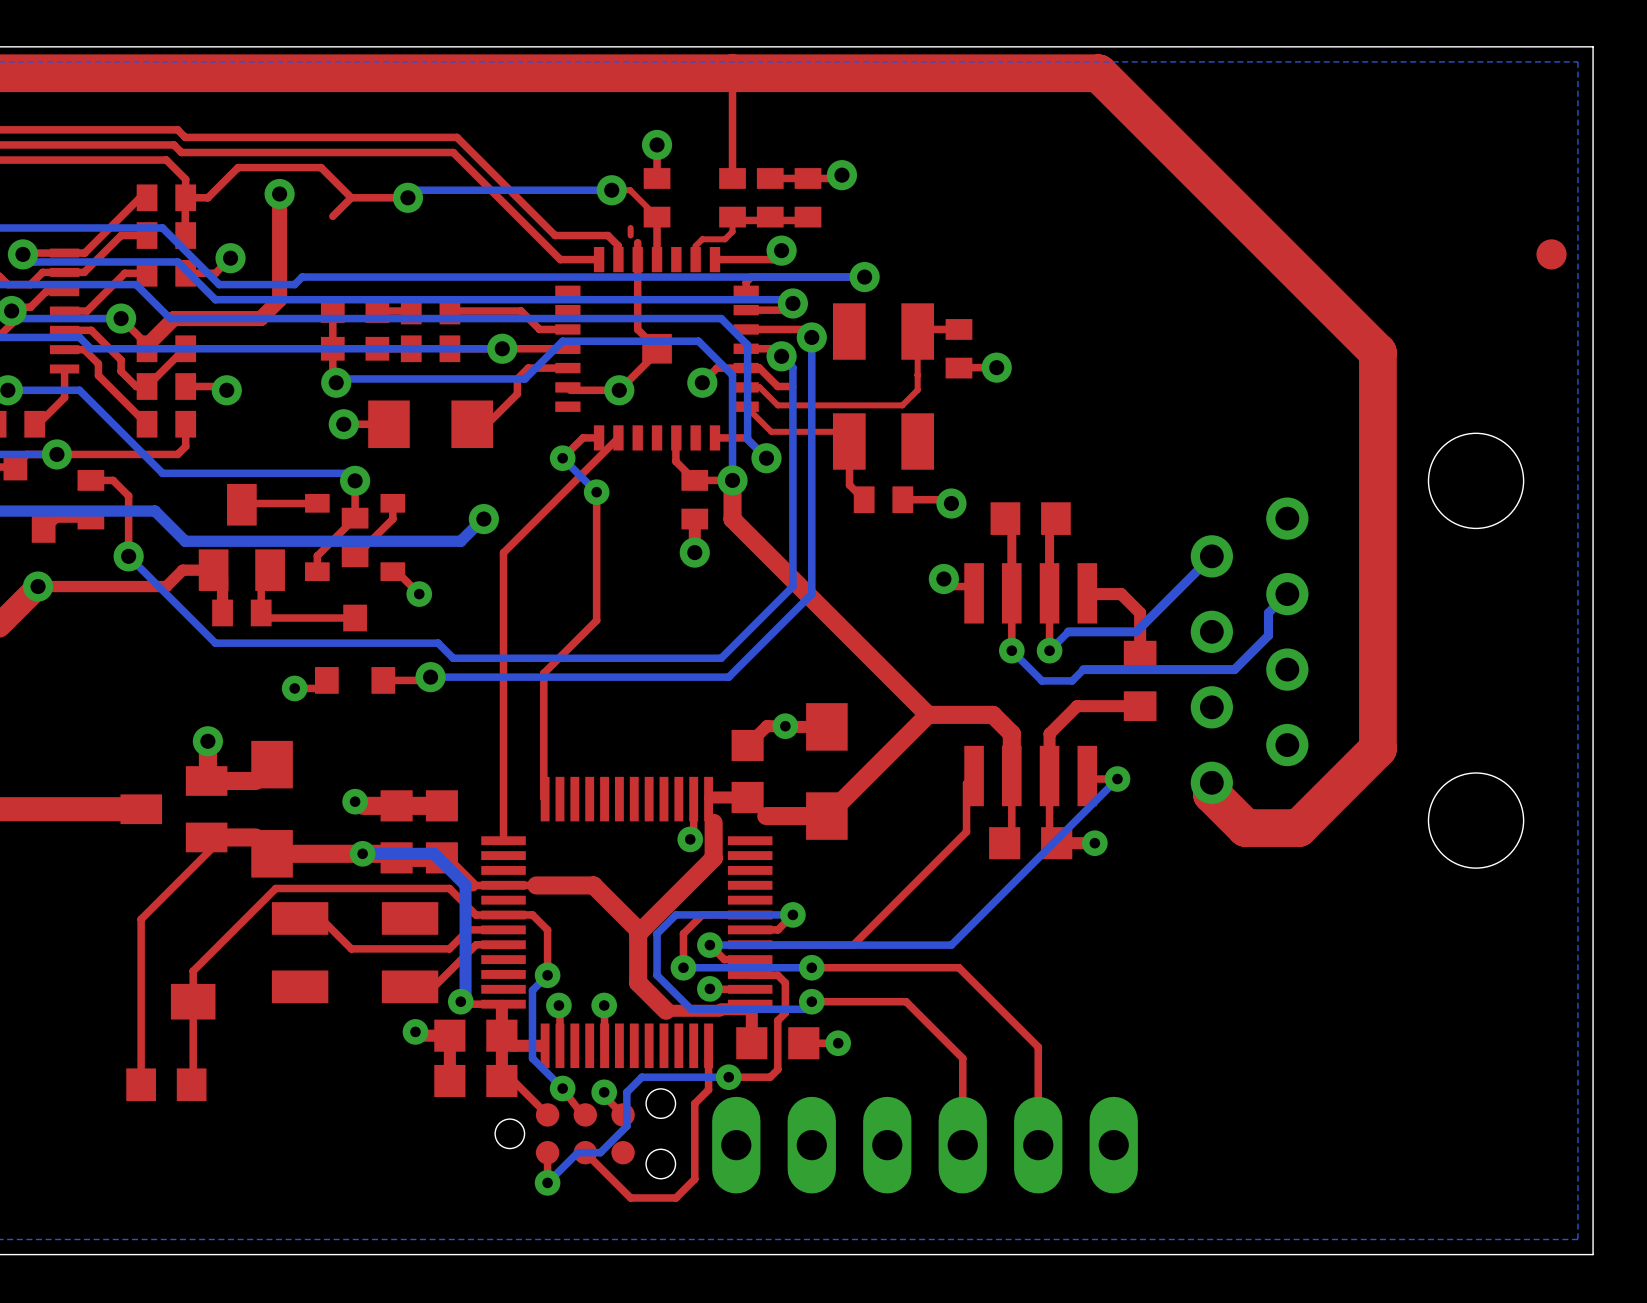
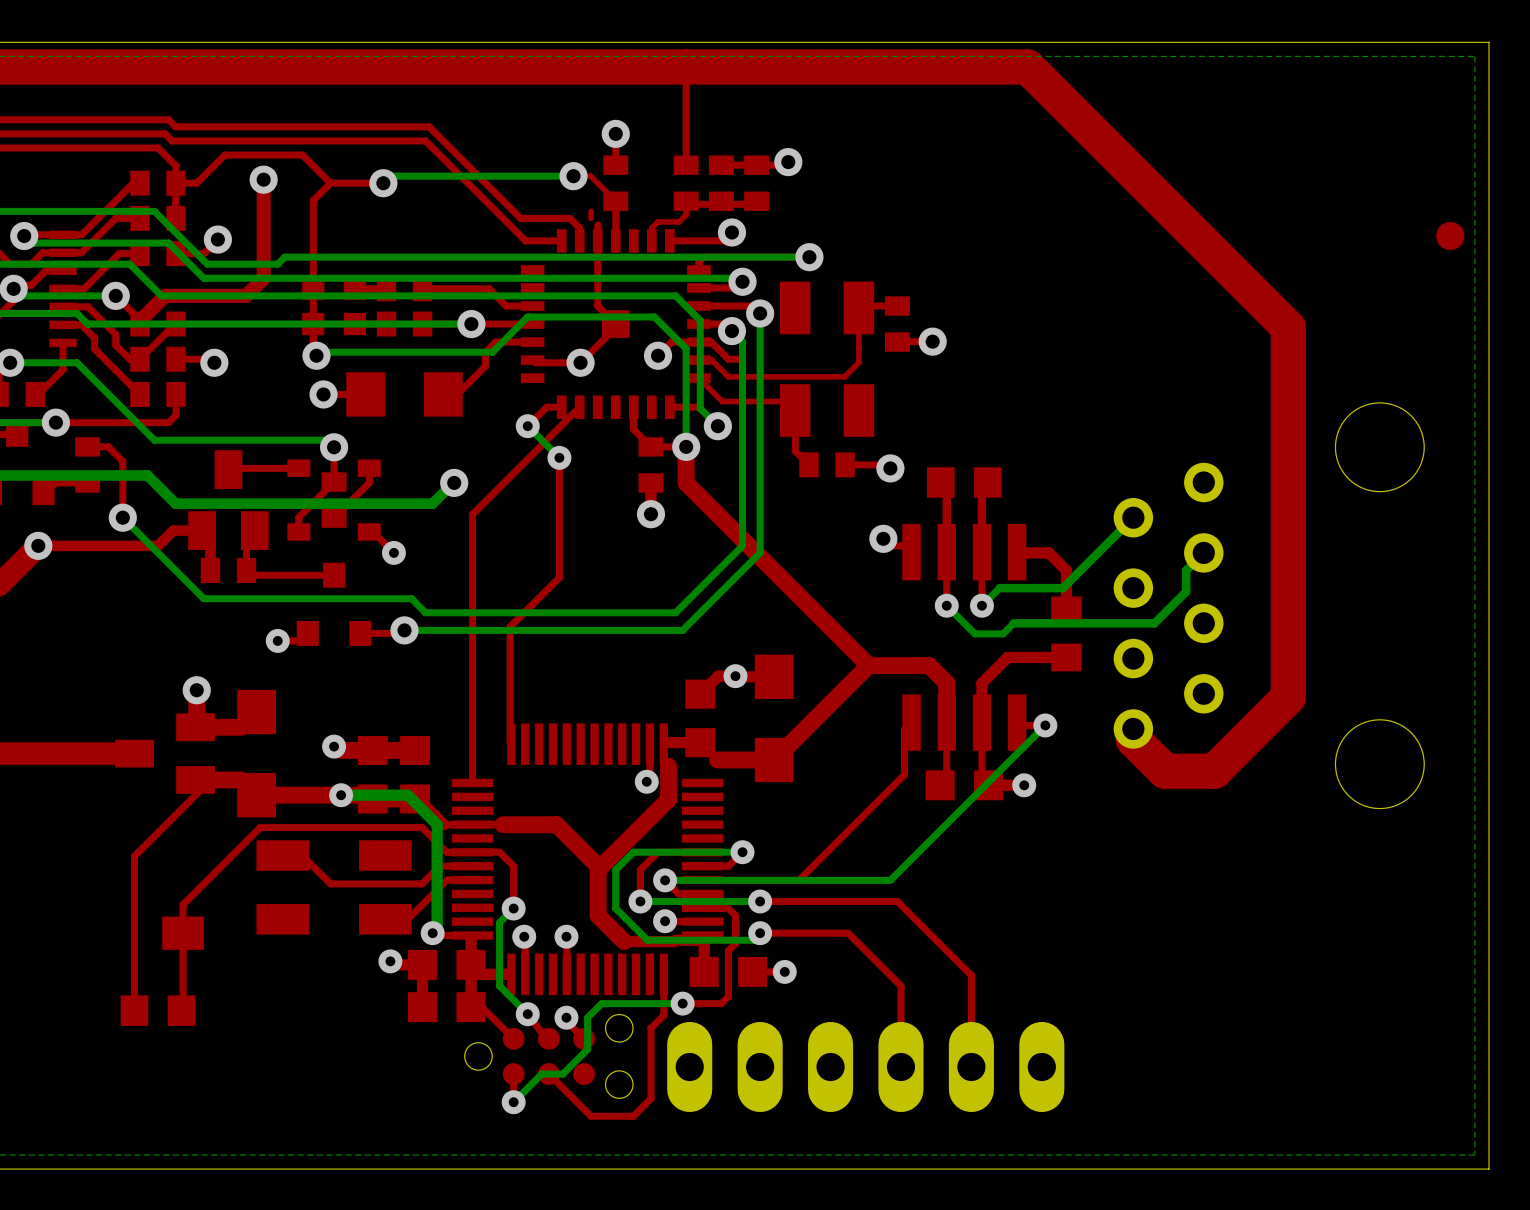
top track: none -> (313, 200) (313, 285)

